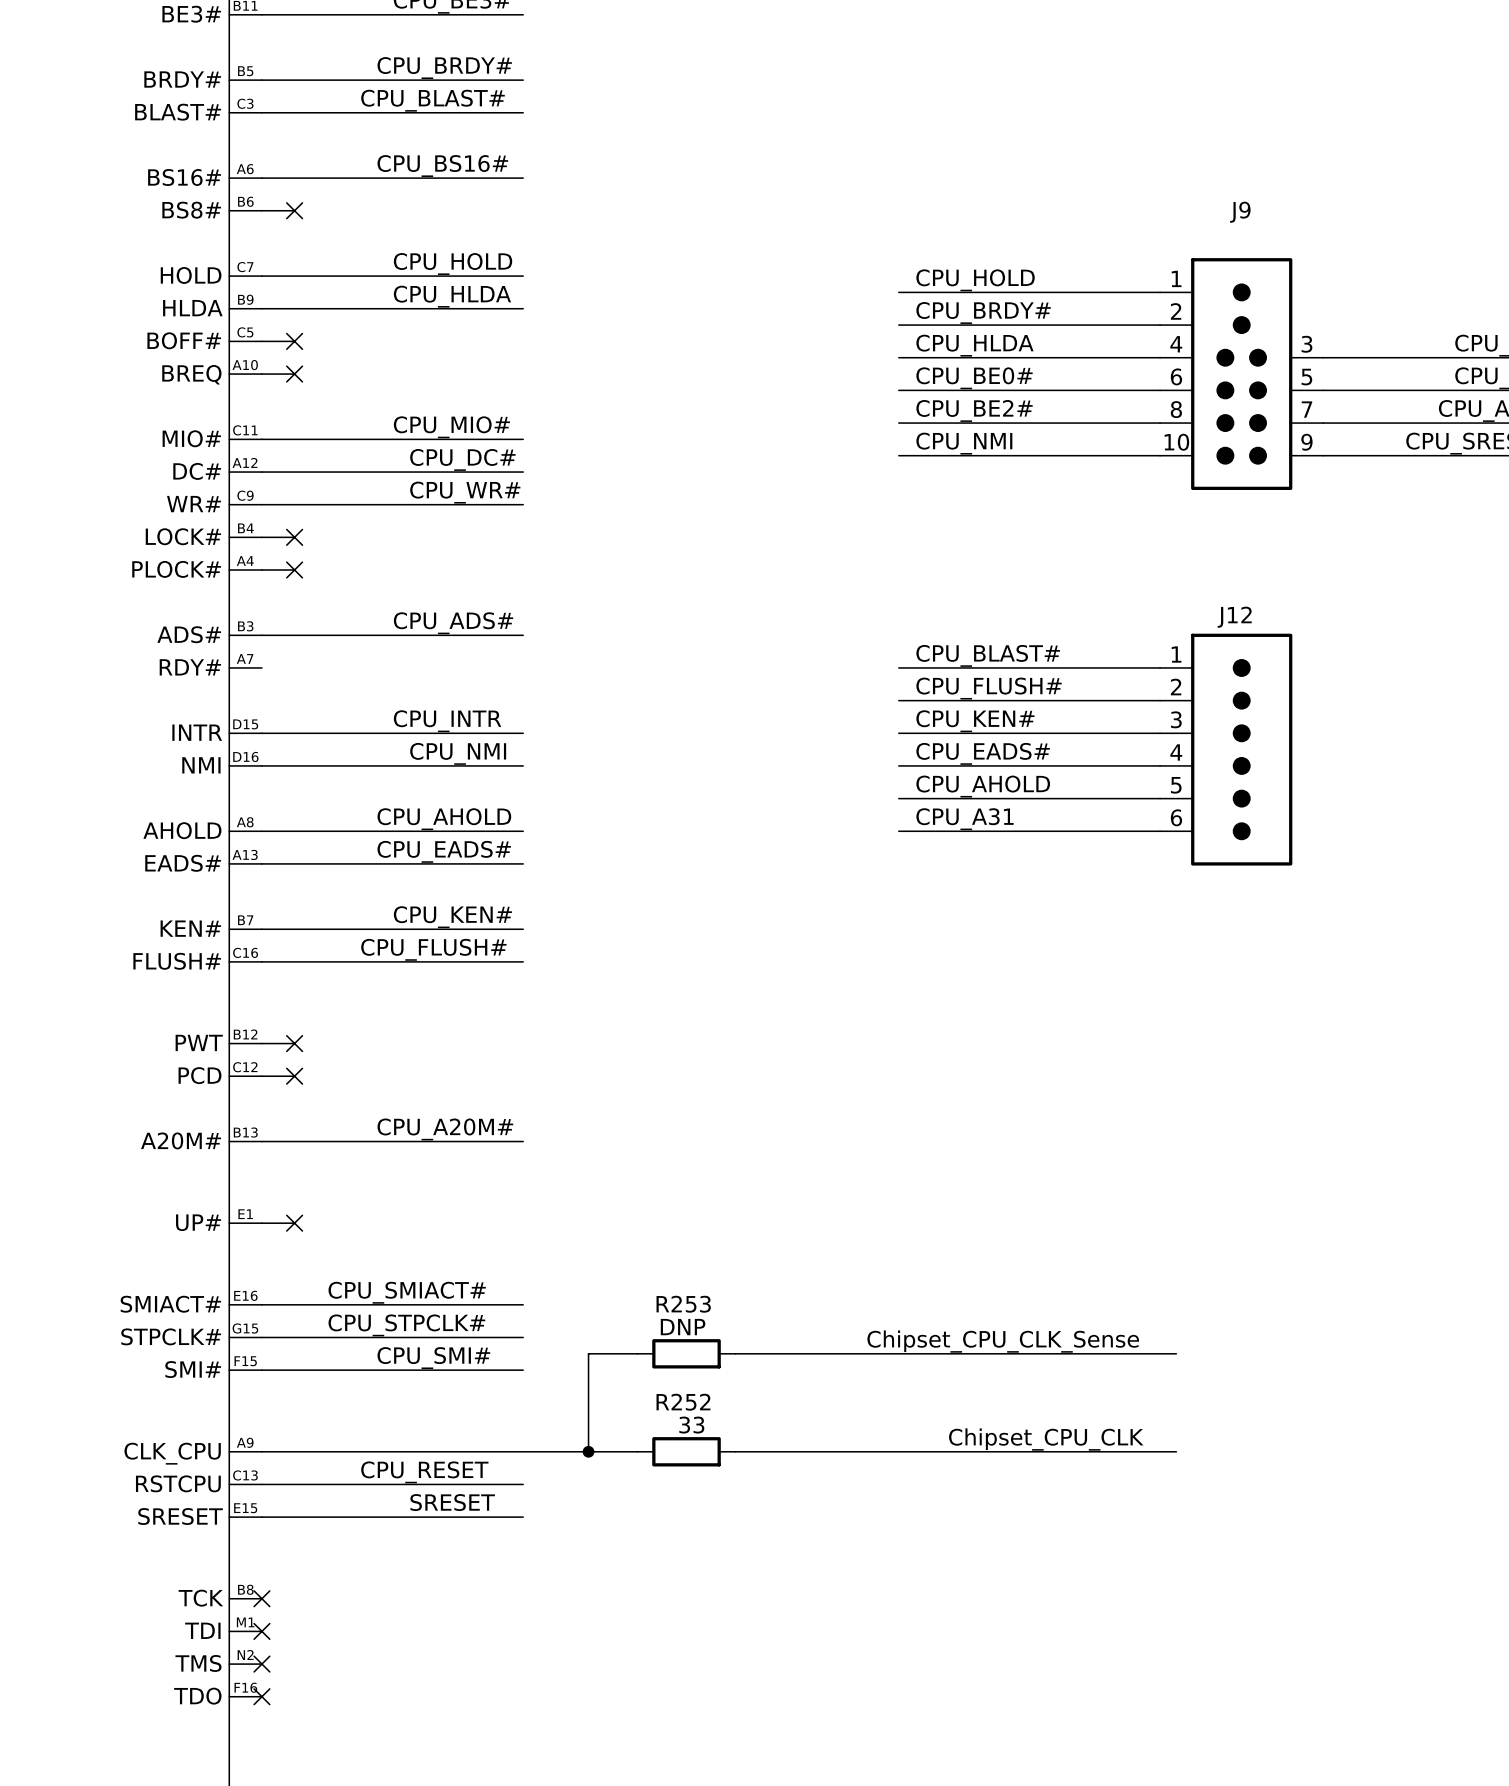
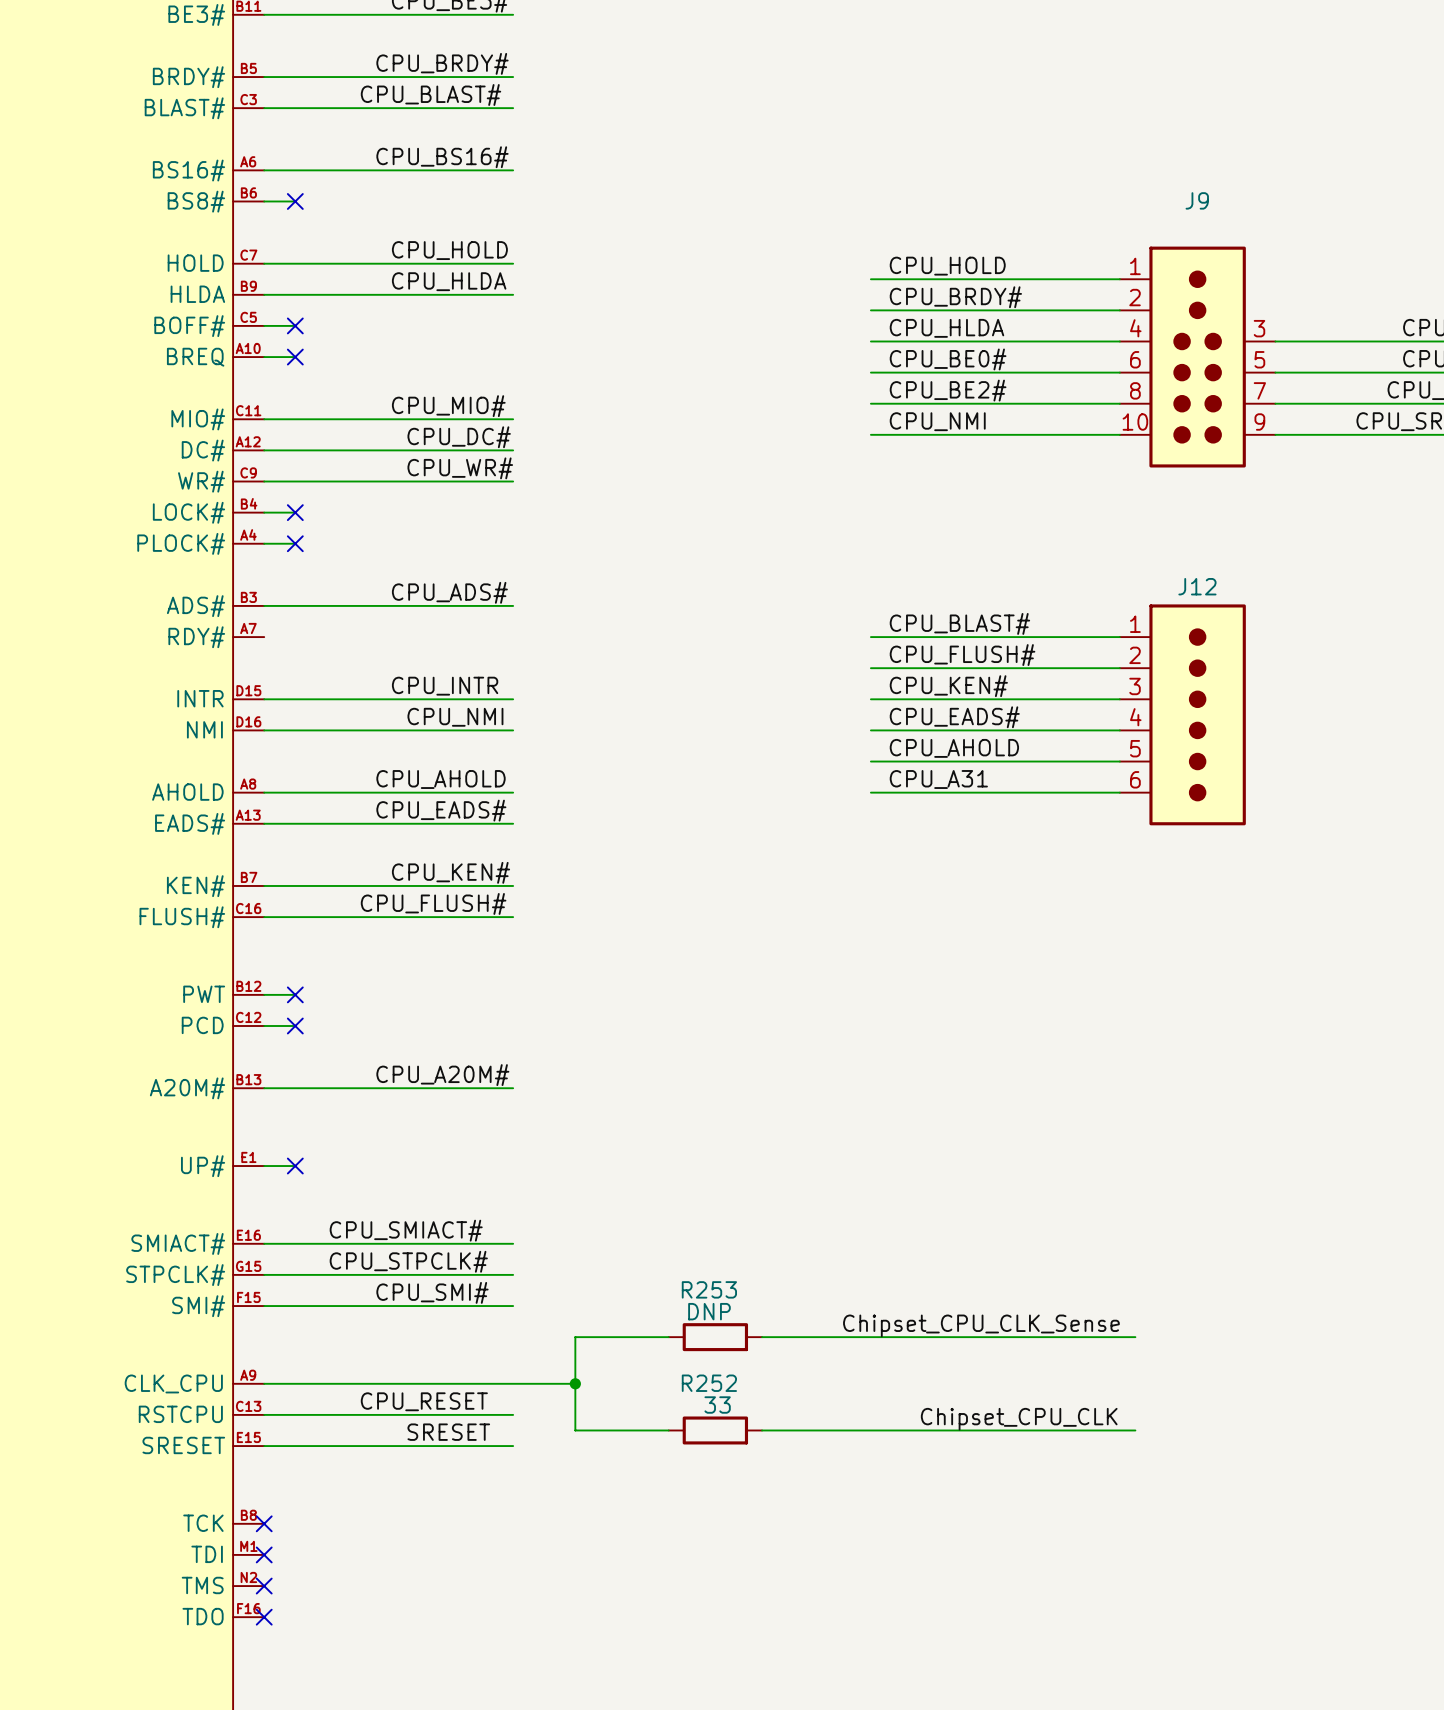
label position: Chipset_CPU_CLK_Sense (1003, 1341) -> Chipset_CPU_CLK_Sense (981, 1325)
wire: (637, 1353) (588, 1353) (588, 1402) -> (668, 1337) (575, 1337)
R253 position: (686, 1353) -> (715, 1337)
wire: (735, 1353) (1176, 1353) -> none
wire: none -> (762, 1337) (1135, 1337)
label position: Chipset_CPU_CLK (1046, 1439) -> Chipset_CPU_CLK (1019, 1419)
wire: (588, 1451) (637, 1451) -> (575, 1383) (575, 1430) (668, 1430)
R252 position: (686, 1451) -> (715, 1430)
wire: (735, 1451) (1176, 1451) -> none
wire: none -> (762, 1430) (1135, 1430)

